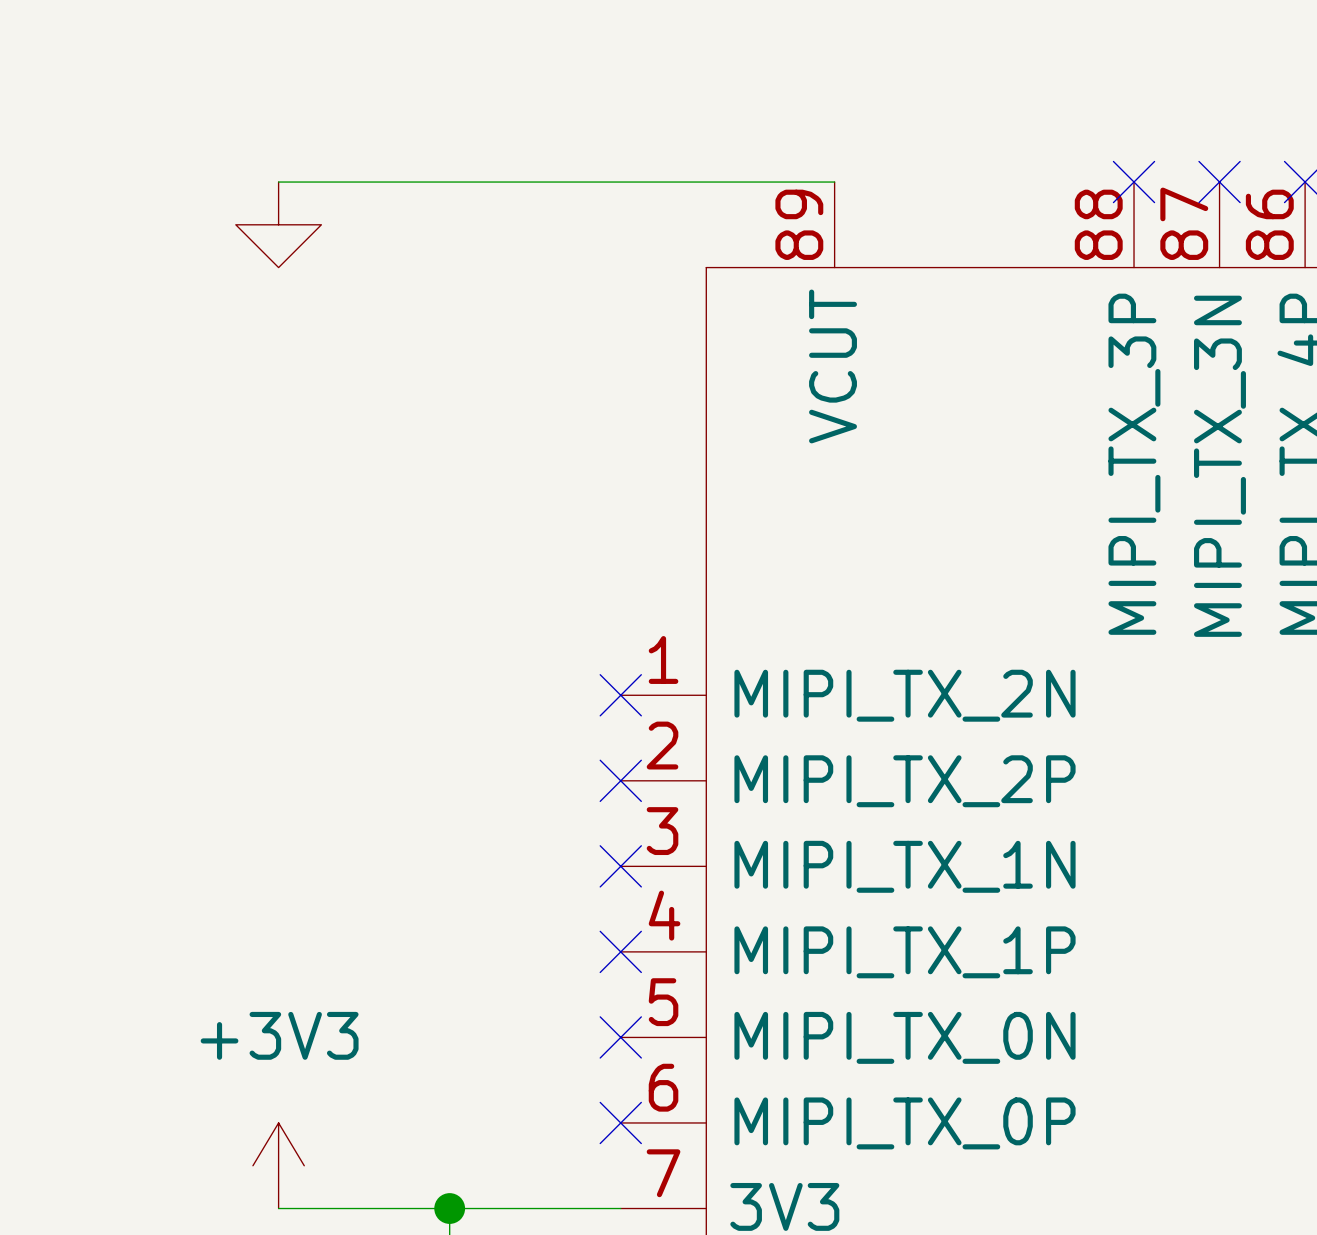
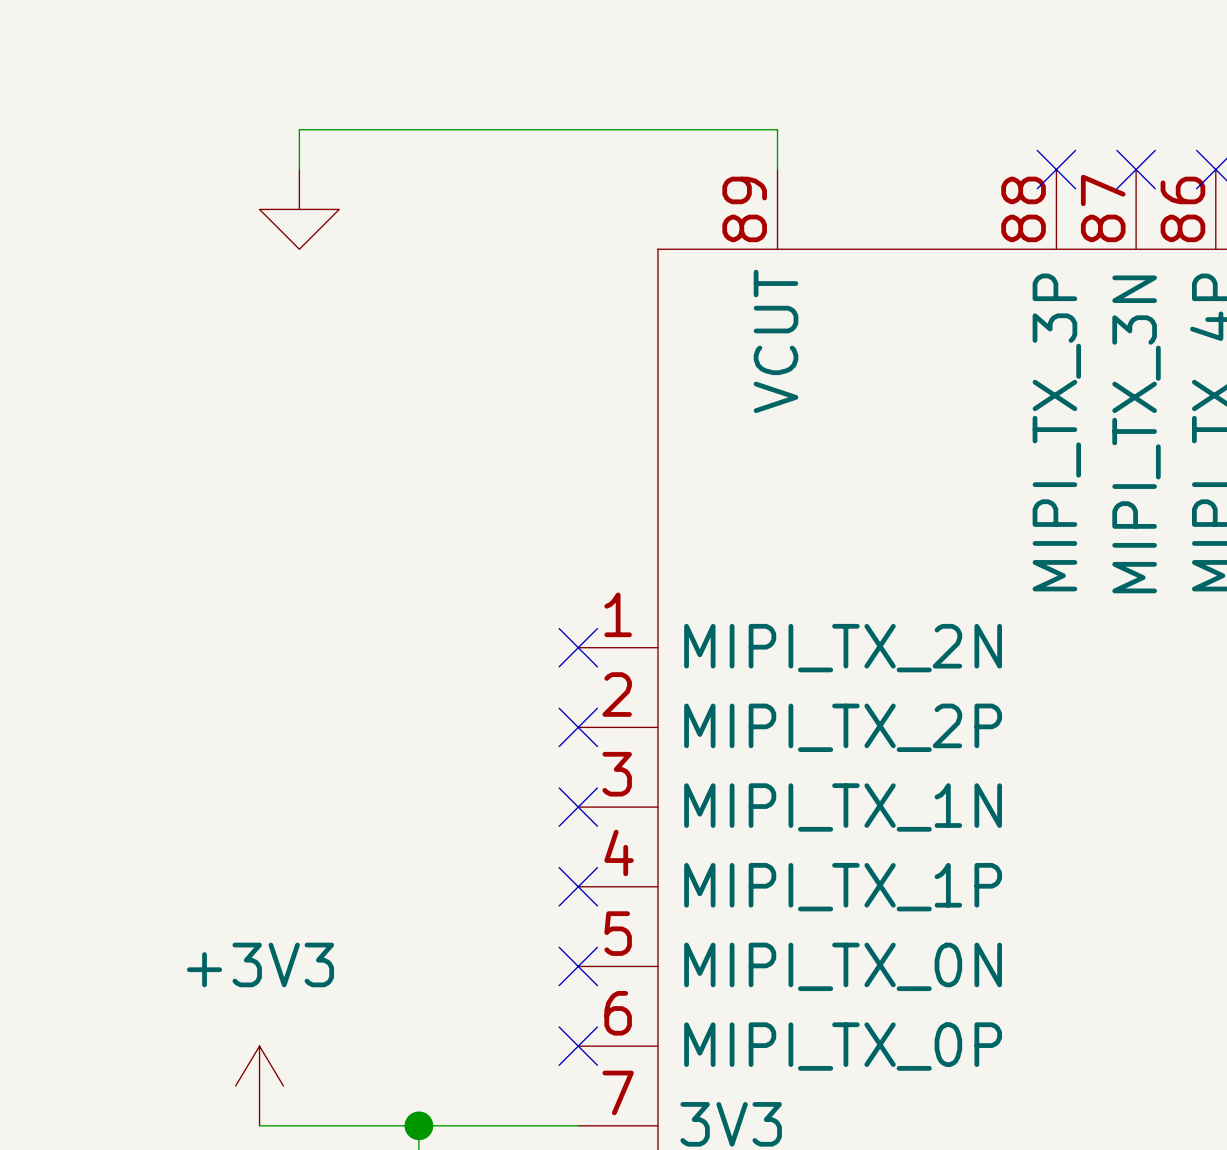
wire: (278, 182) (834, 182) -> (299, 169) (299, 129) (777, 129) (777, 169)
power symbol position: (278, 224) -> (299, 209)

